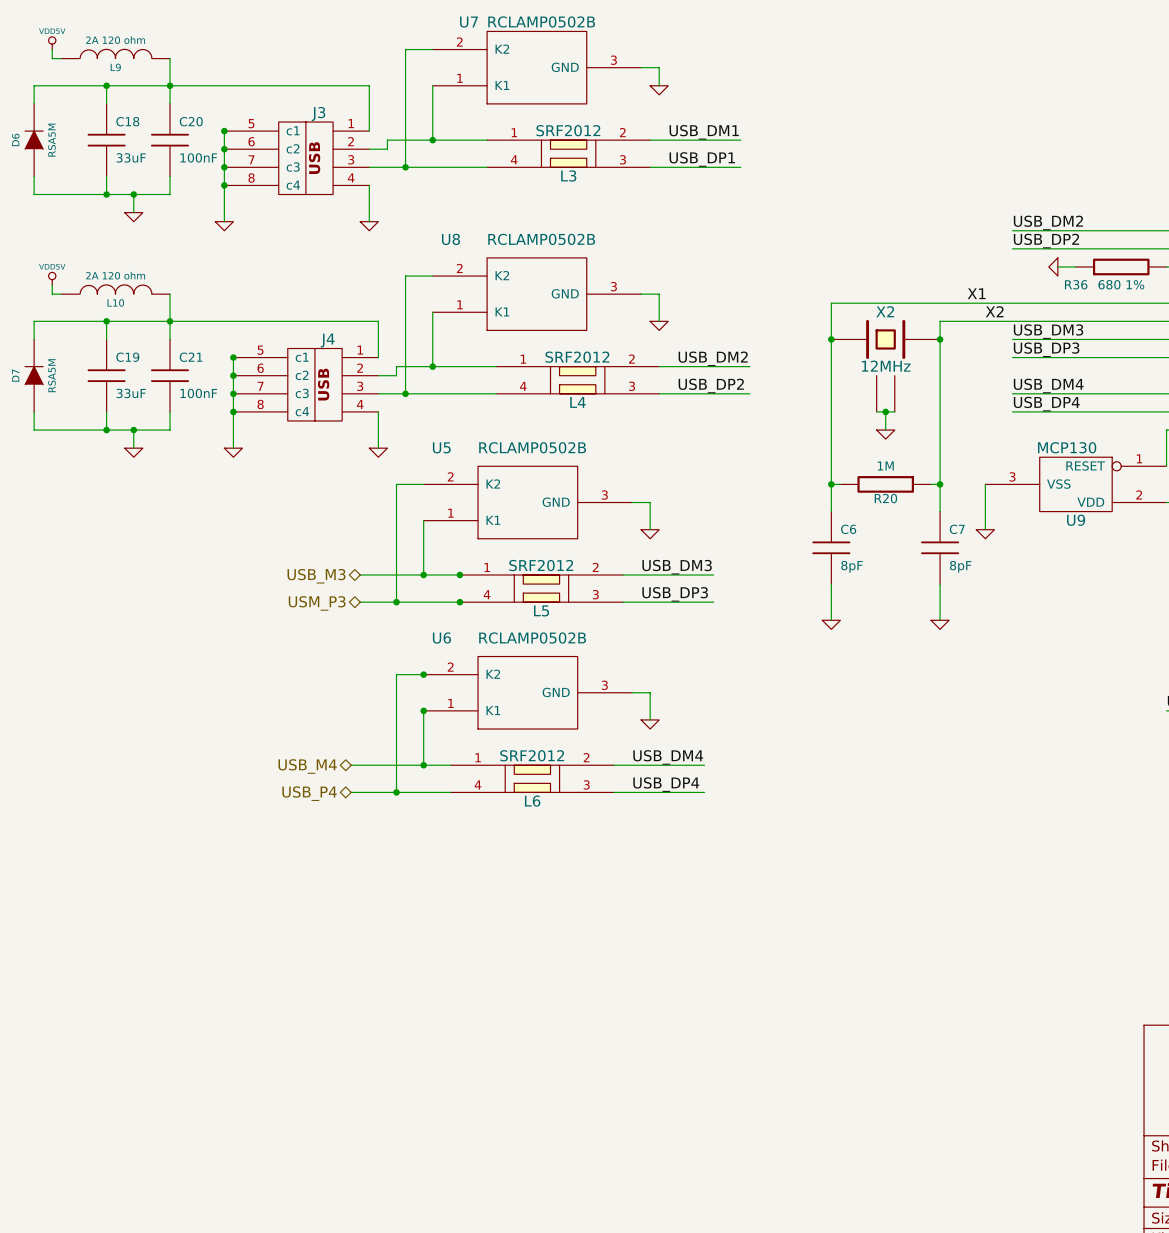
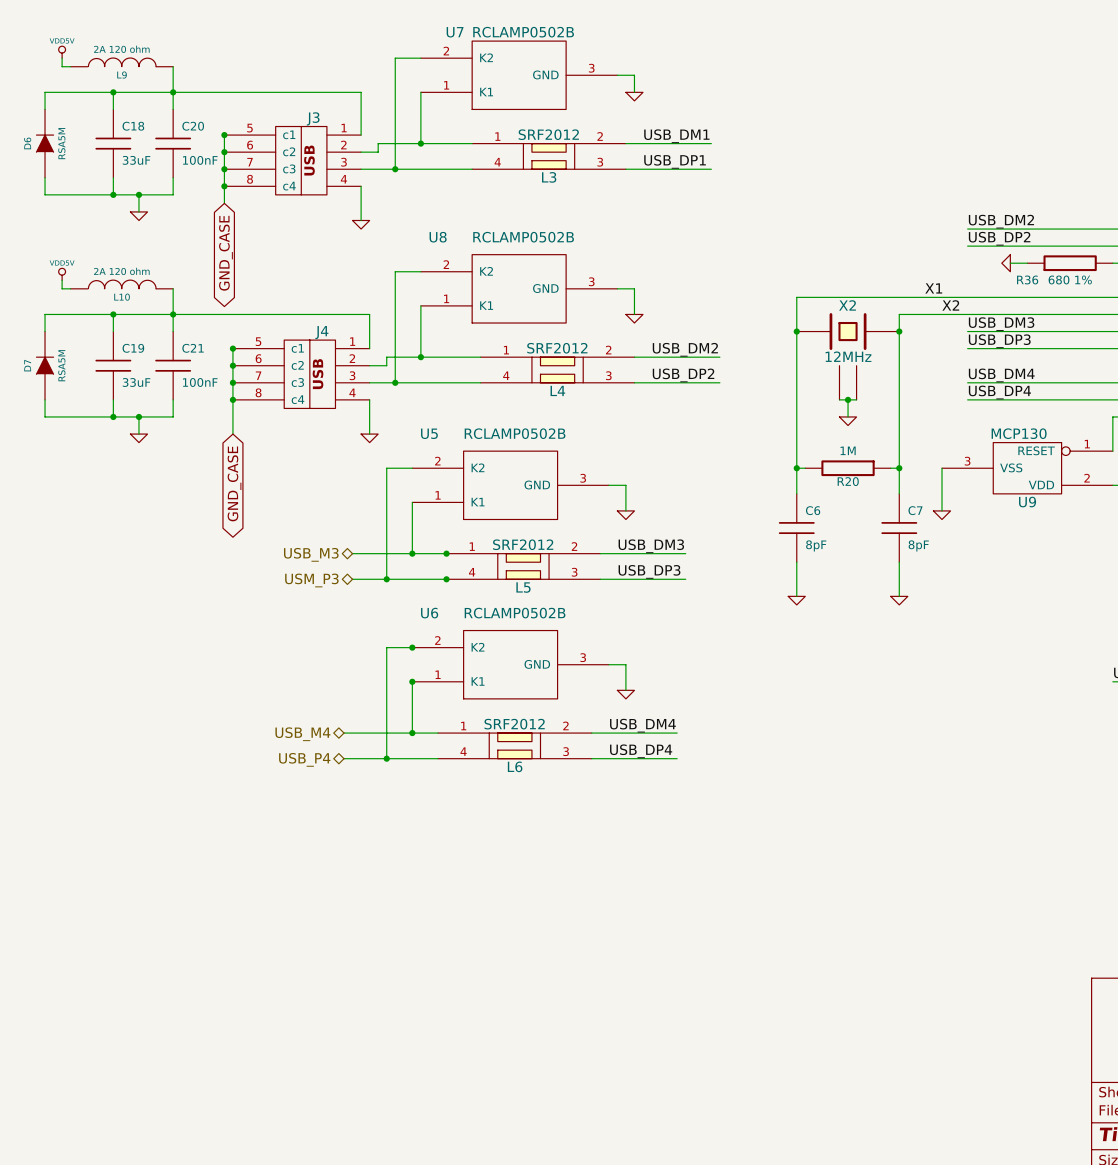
wire: (224, 203) (224, 221) -> none
power symbol: (224, 226) -> none
global label: none -> GND_CASE (225, 253)
power symbol: (233, 452) -> none
global label: none -> GND_CASE (234, 483)

